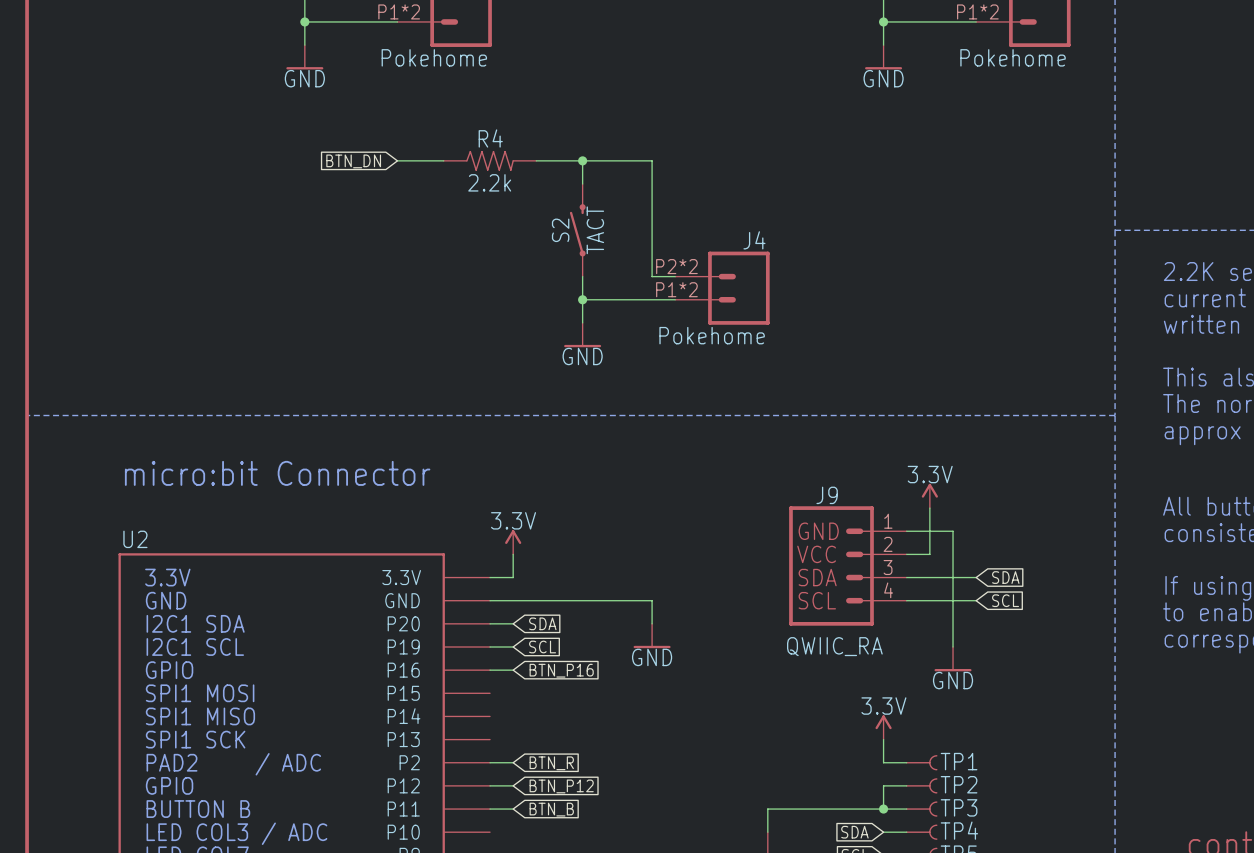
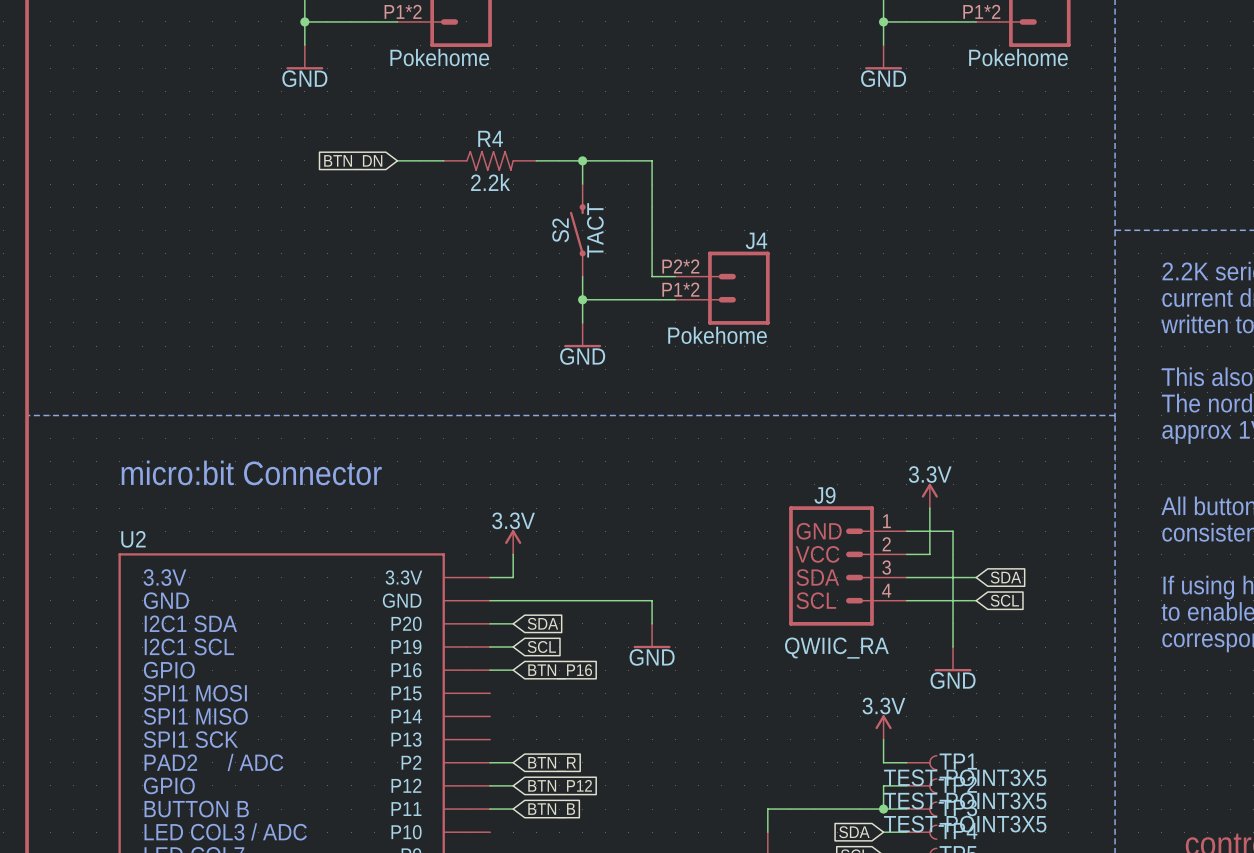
TP1 value: none -> TEST-POINT3X5 (965, 777)
TP2 value: none -> TEST-POINT3X5 (965, 800)
TP3 value: none -> TEST-POINT3X5 (965, 824)

